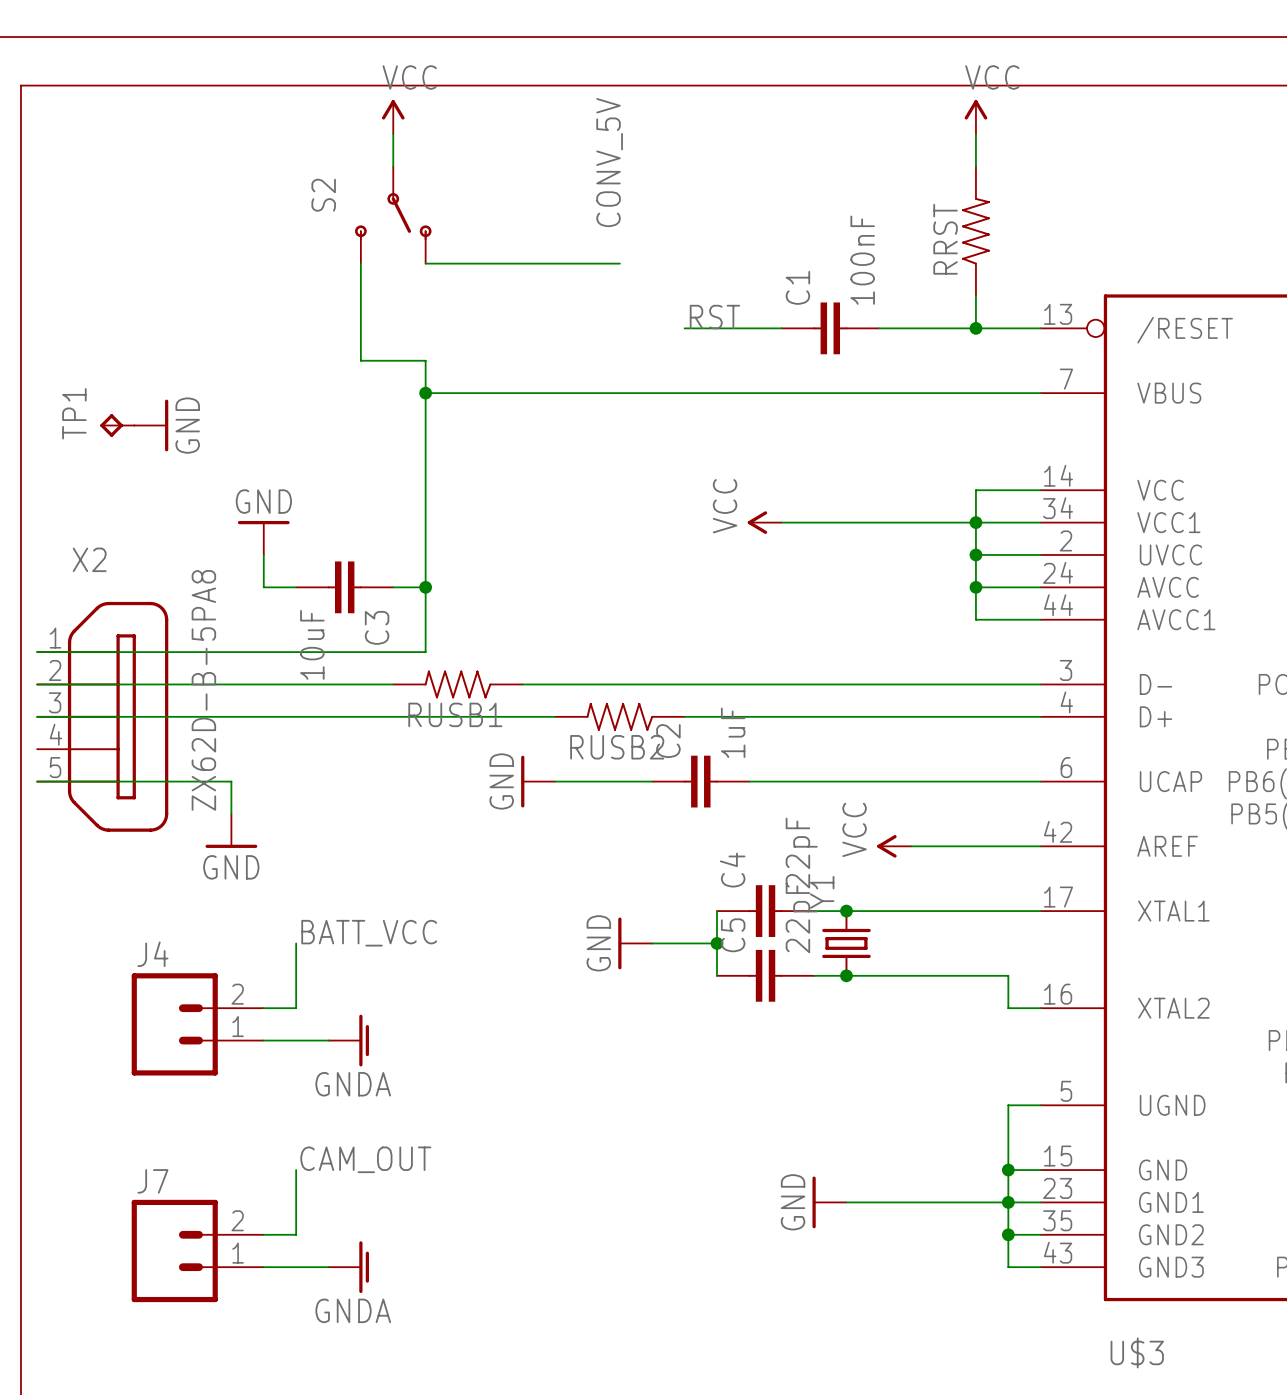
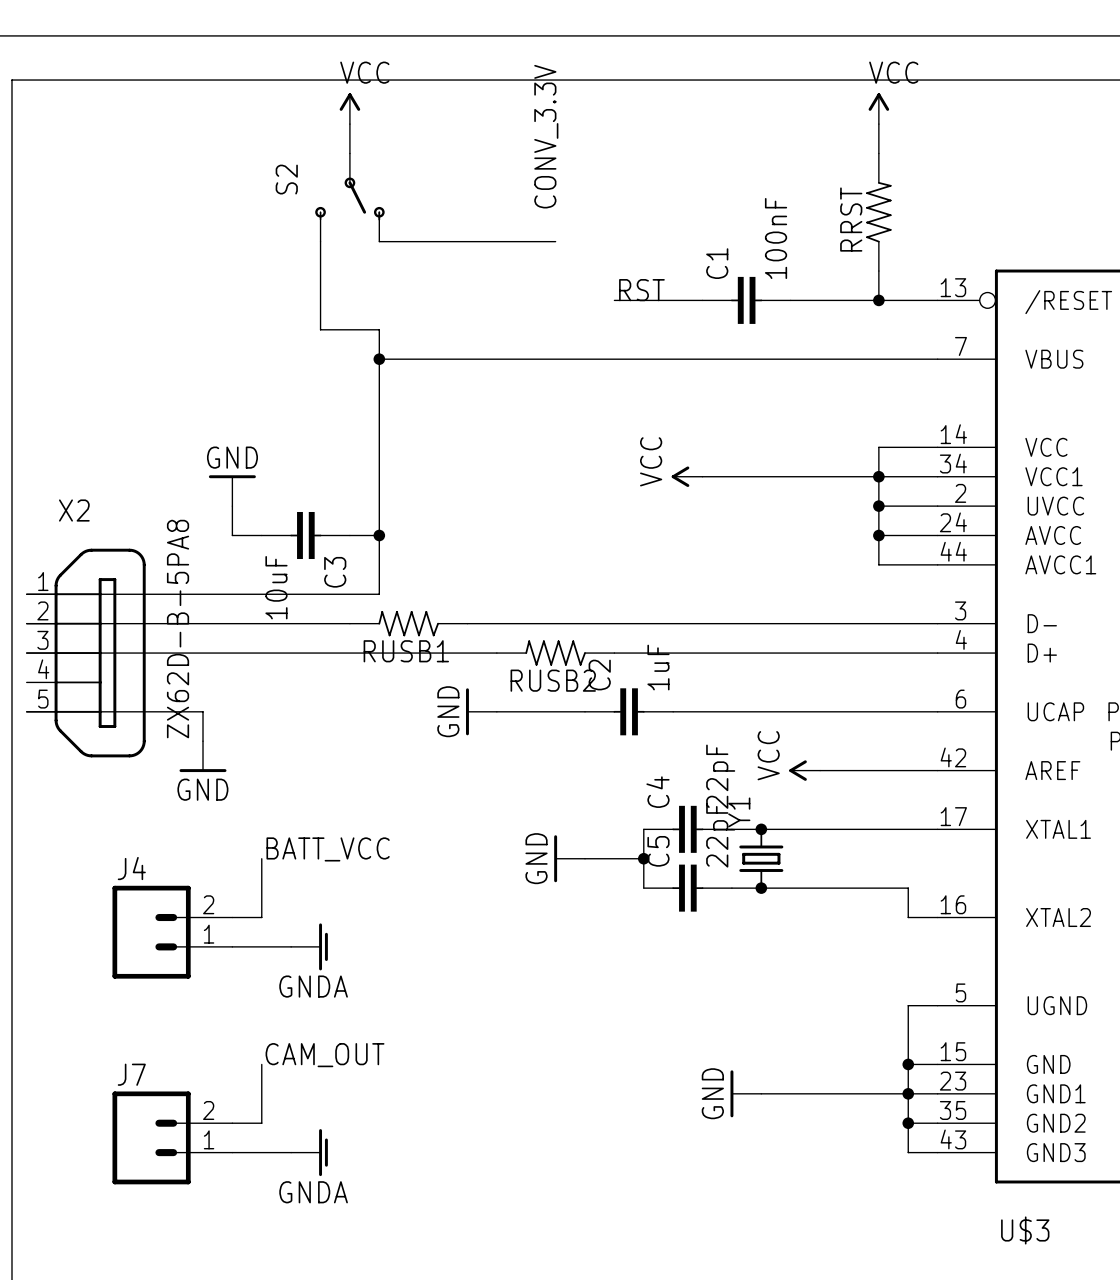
label: CONV_5V (609, 162) -> CONV_3.3V (546, 136)
TP1: (117, 425) -> none
power symbol: GND (151, 425) -> none

